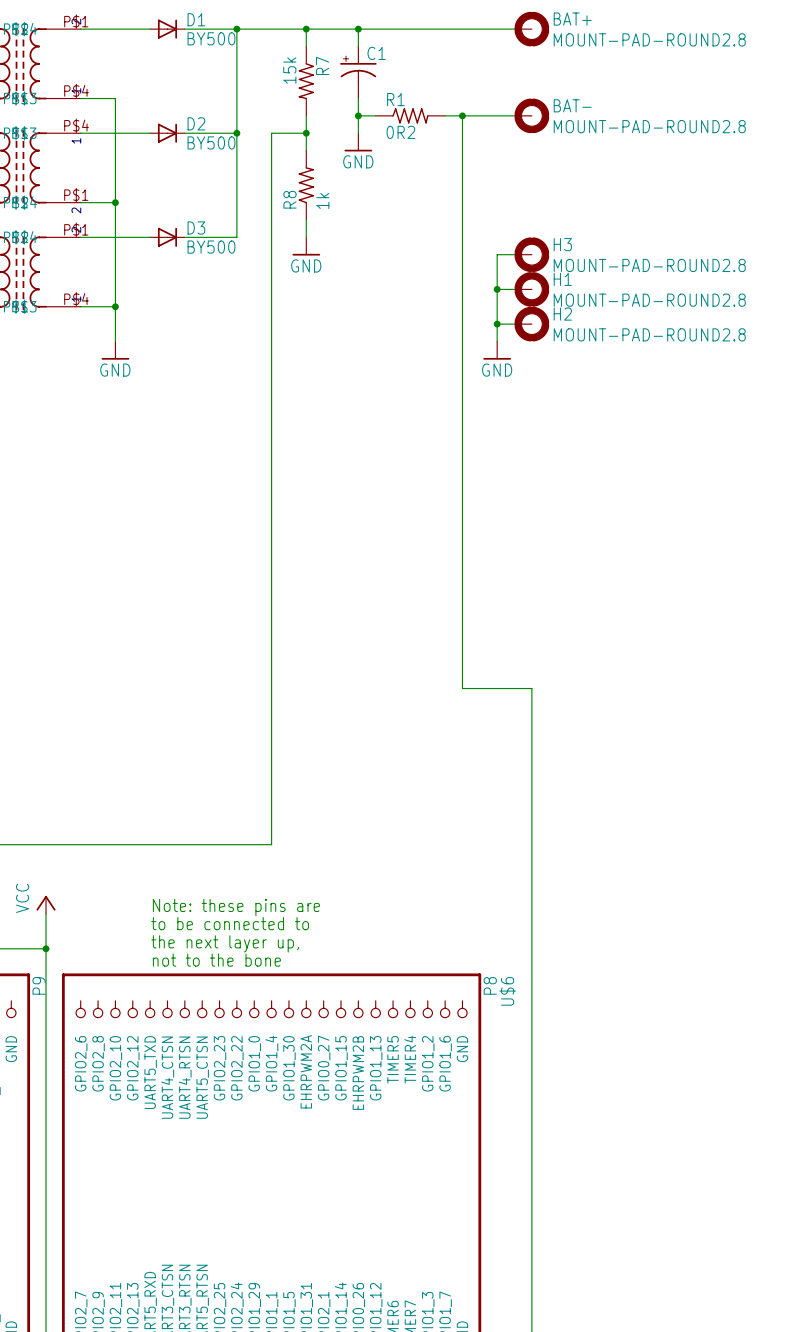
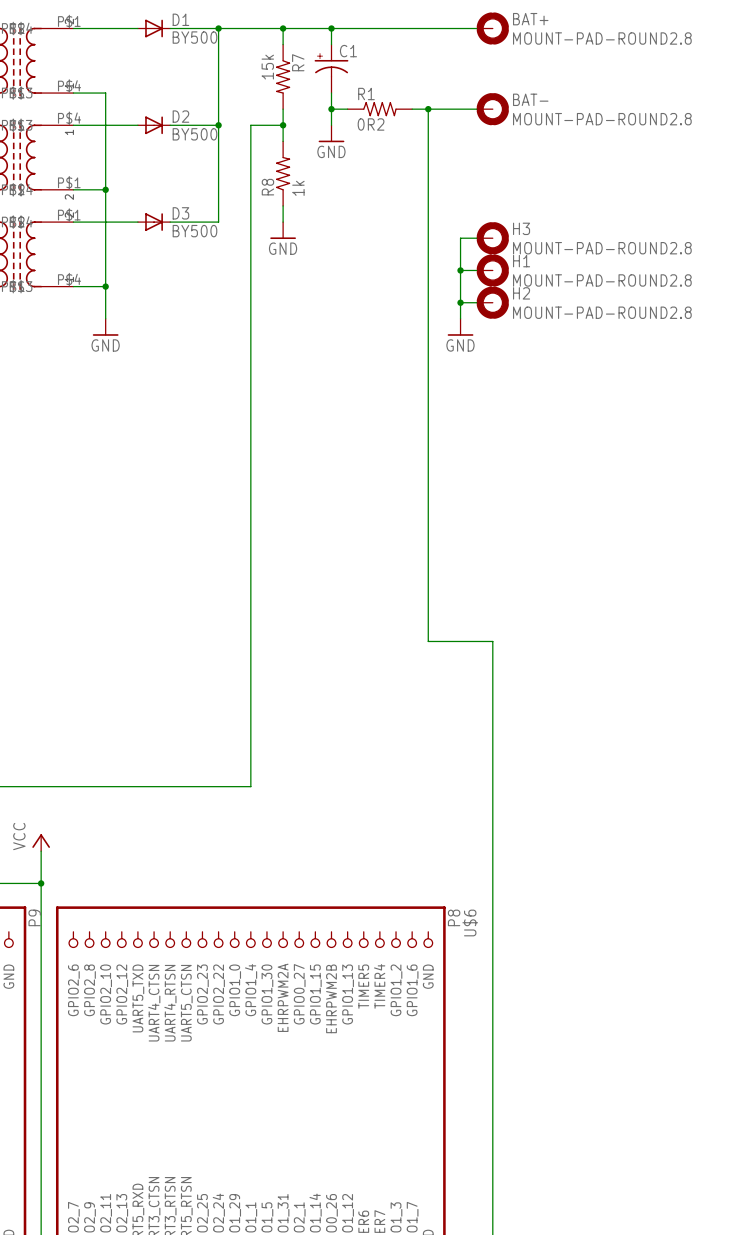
text: Note: these pins are (236, 907) -> none
text: to be connected to (230, 923) -> none
text: the next layer up, (225, 943) -> none
text: not to the bone (216, 960) -> none

